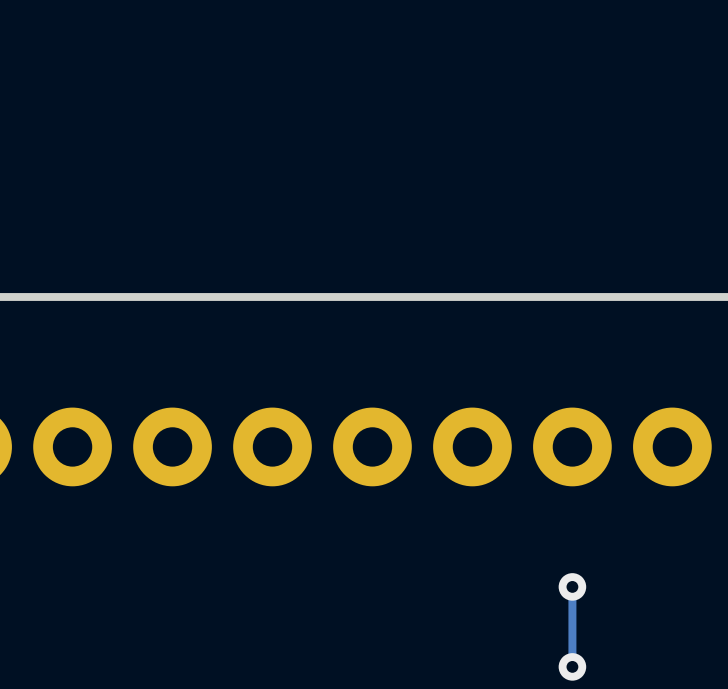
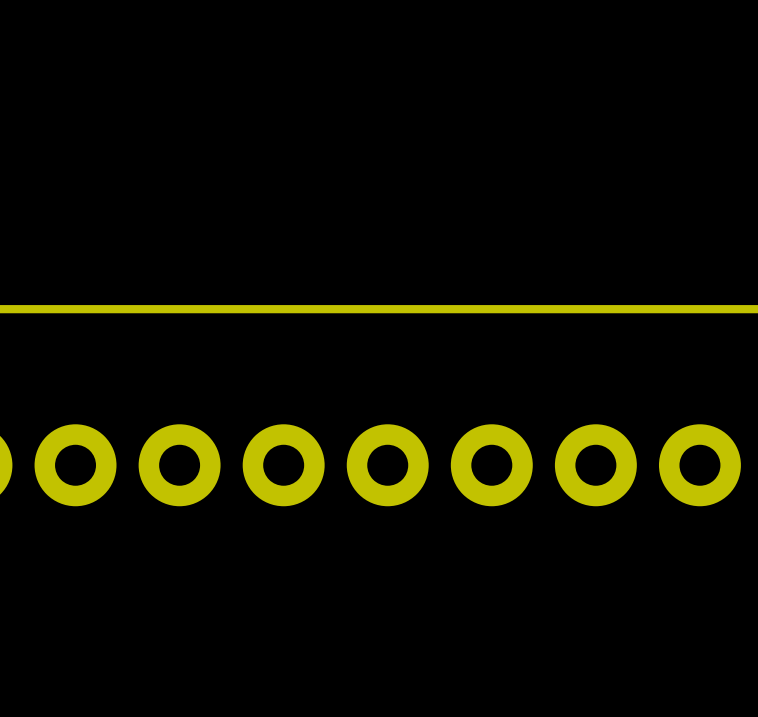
track: (572, 586) (572, 666) -> none
via: (572, 586) -> none
via: (572, 666) -> none

